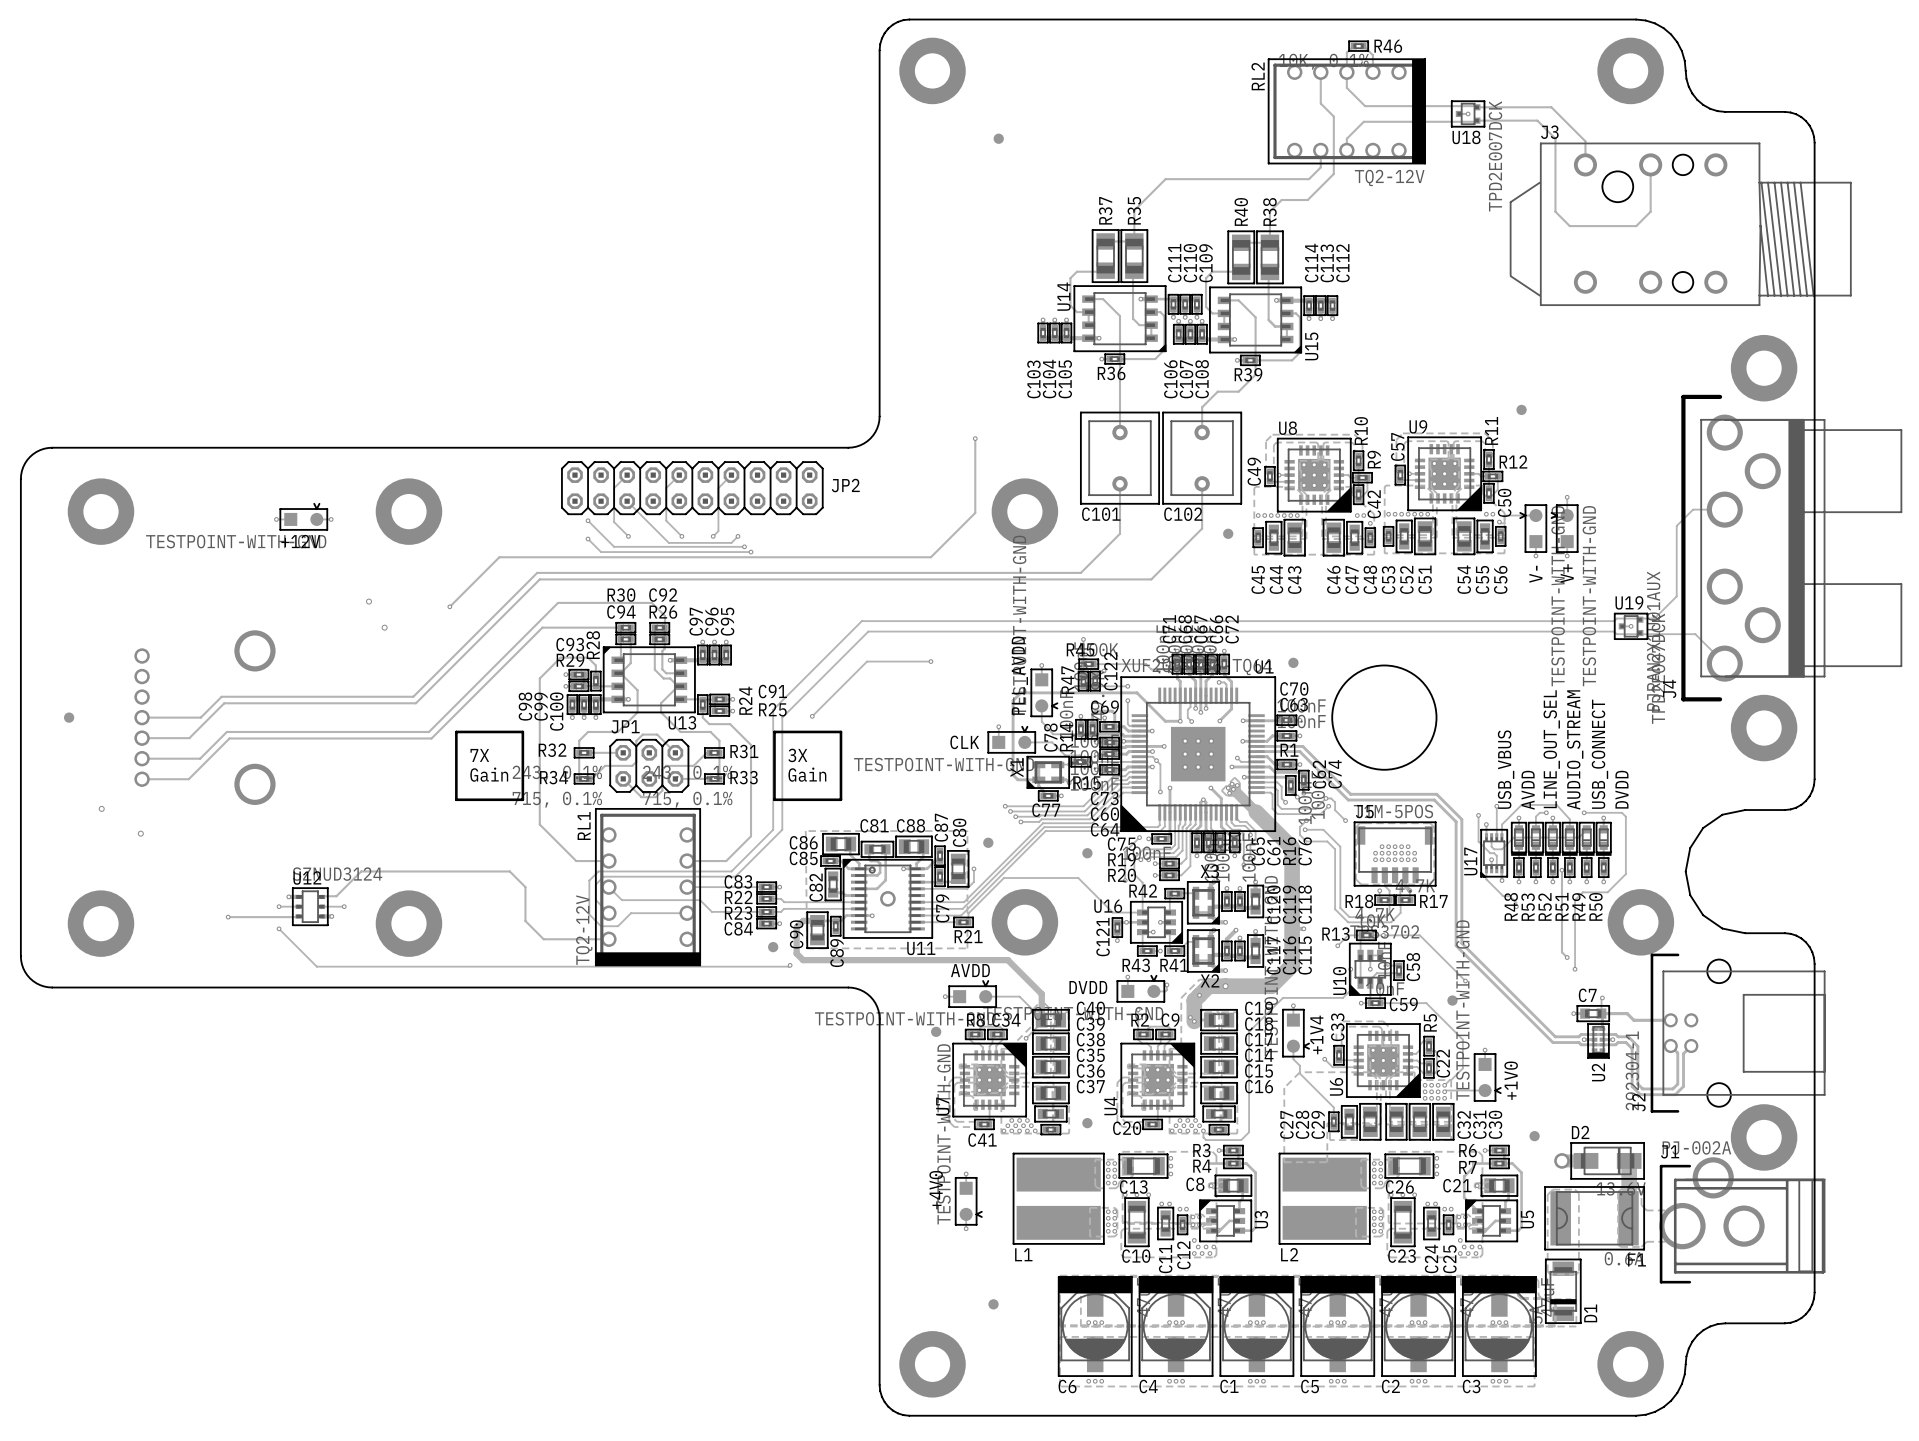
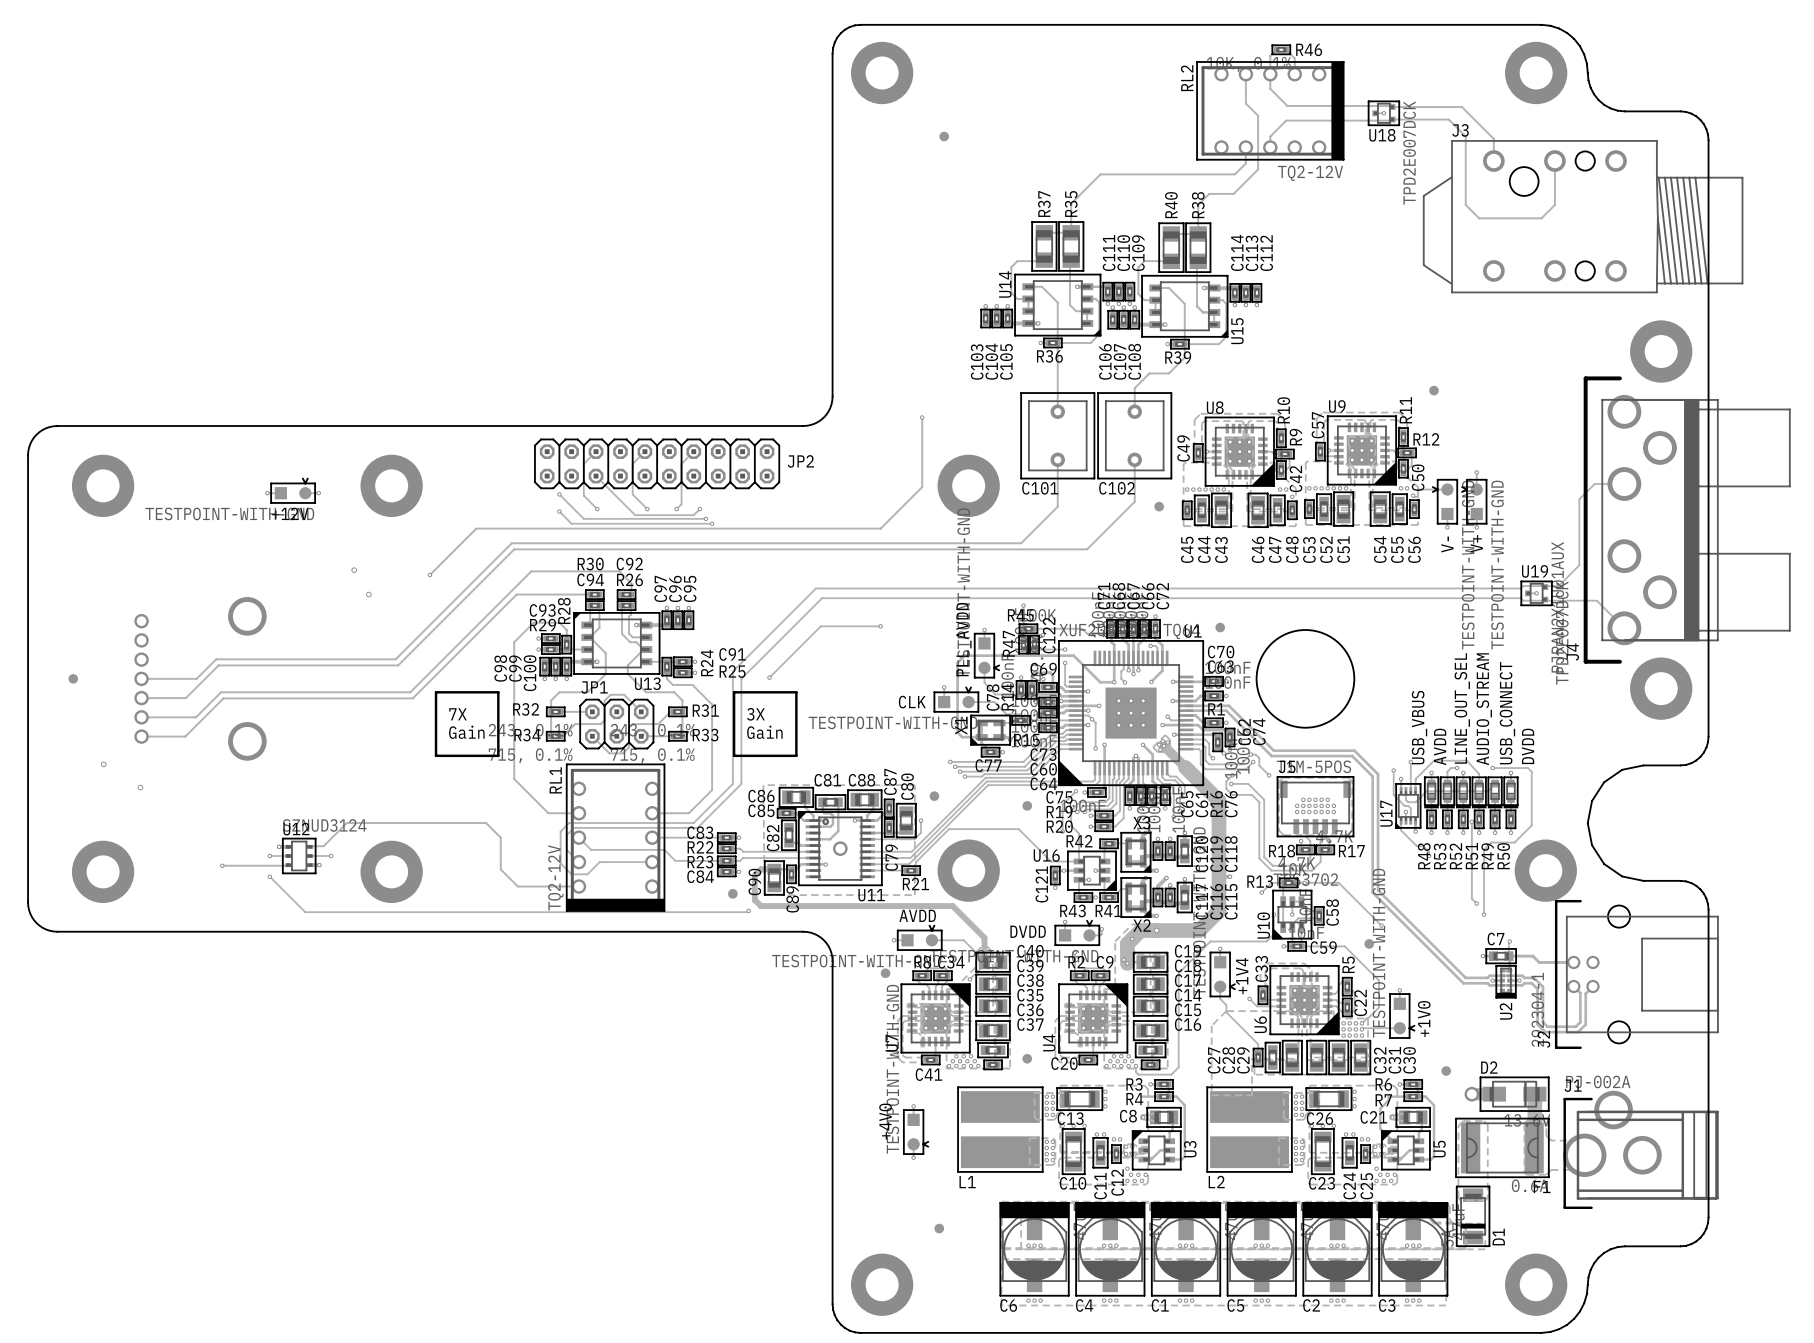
via: (1764, 1137) -> none

